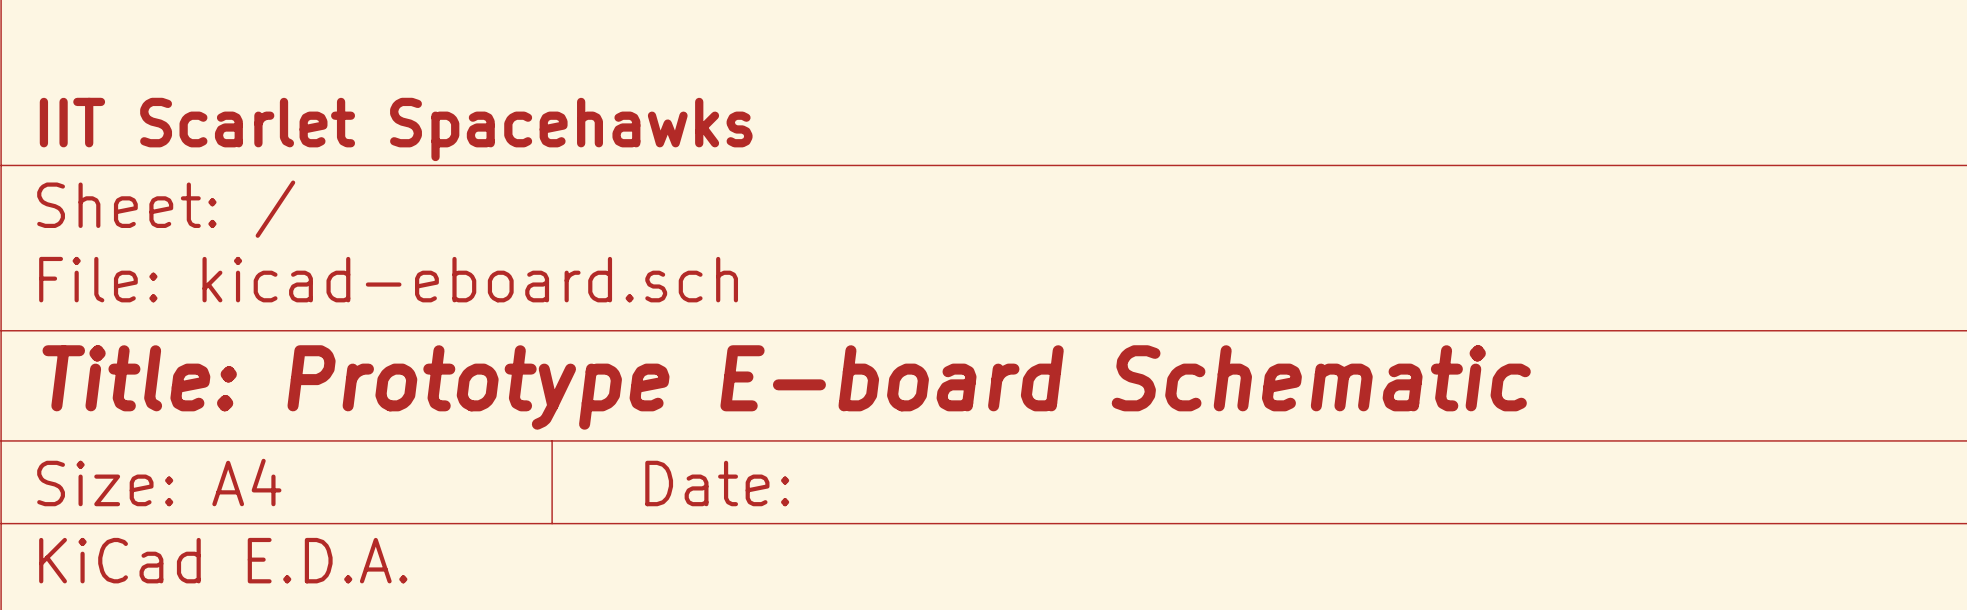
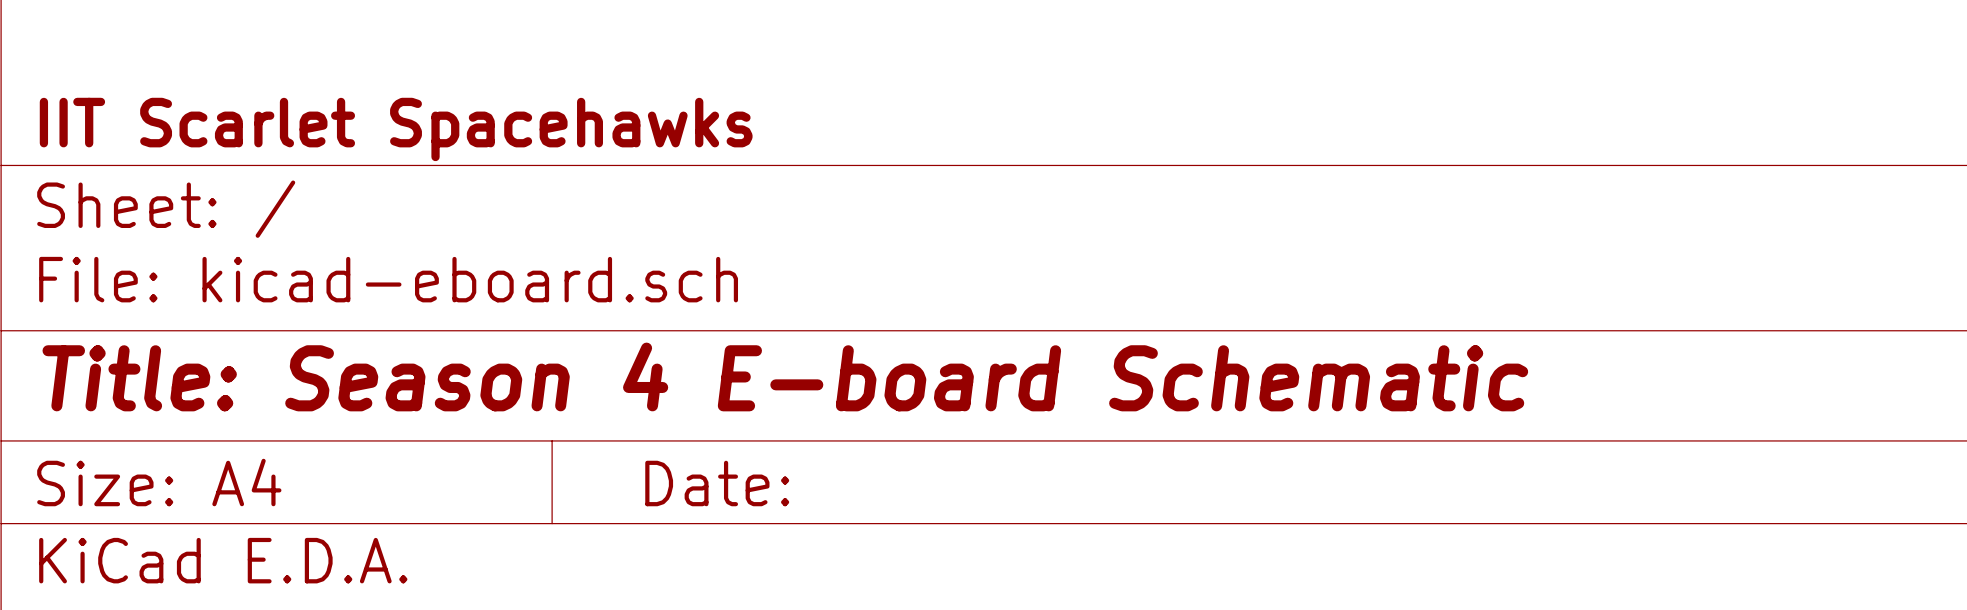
title block: Title: Prototype E-board Schematic (786, 387) -> Title: Season 4 E-board Schematic (785, 376)

